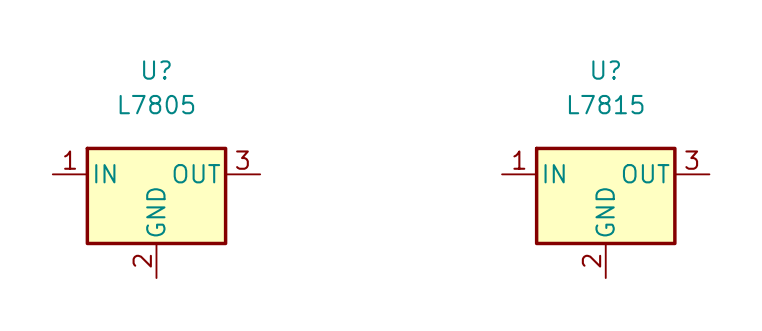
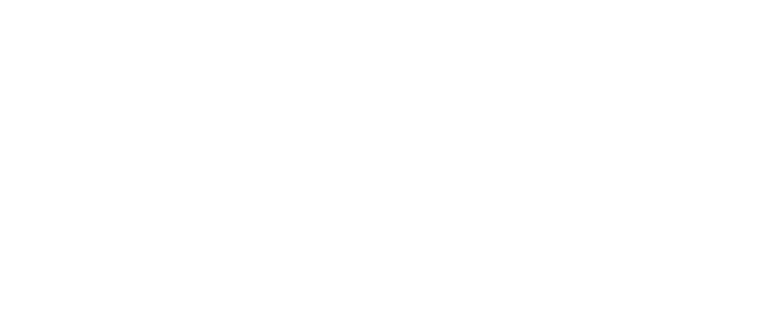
U?: L7805 (156, 212) -> none
U?: L7815 (605, 212) -> none

